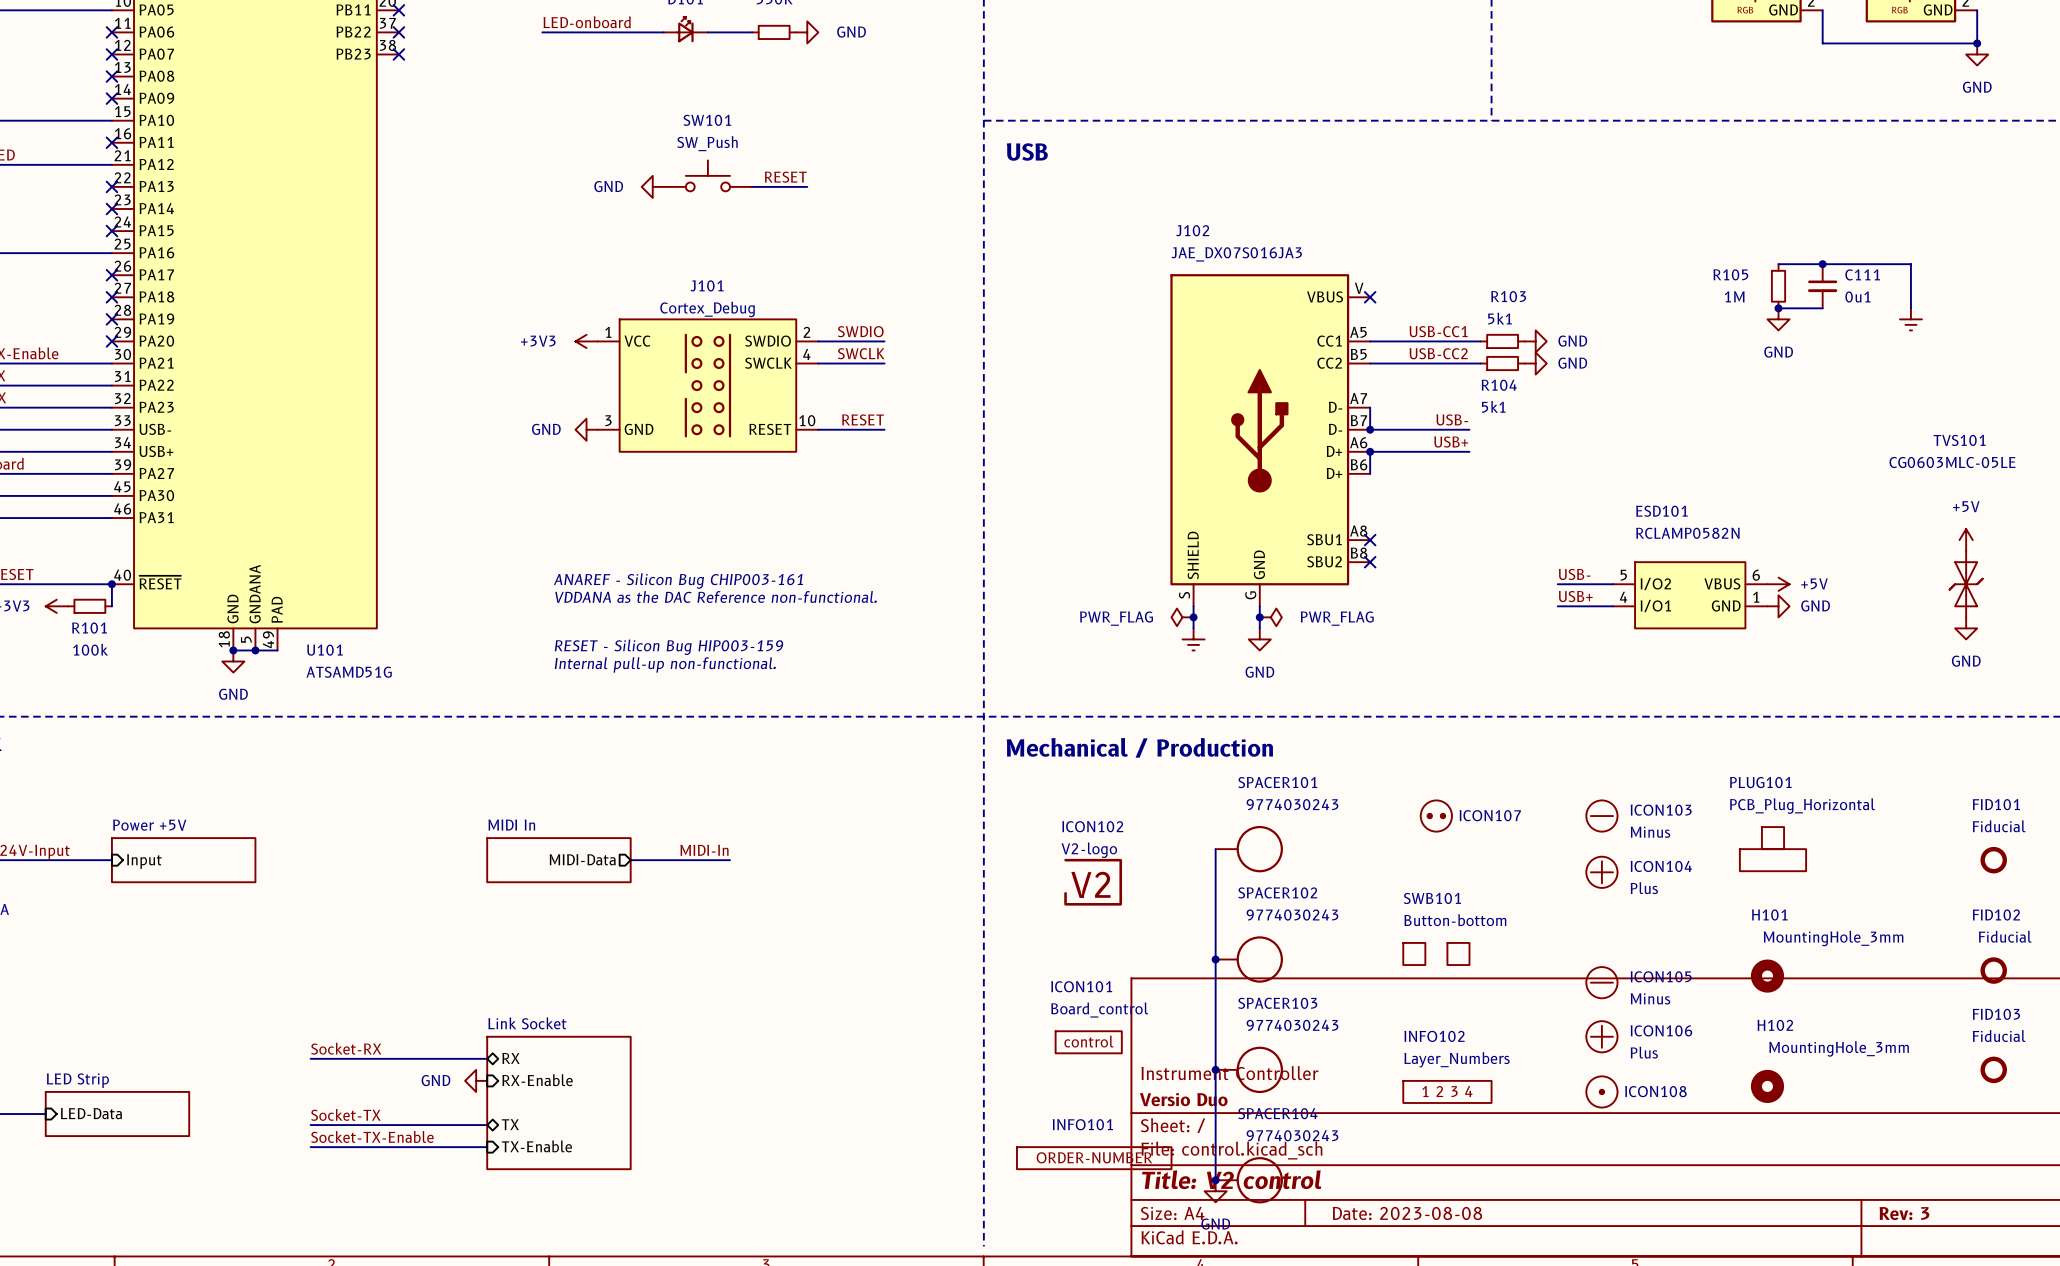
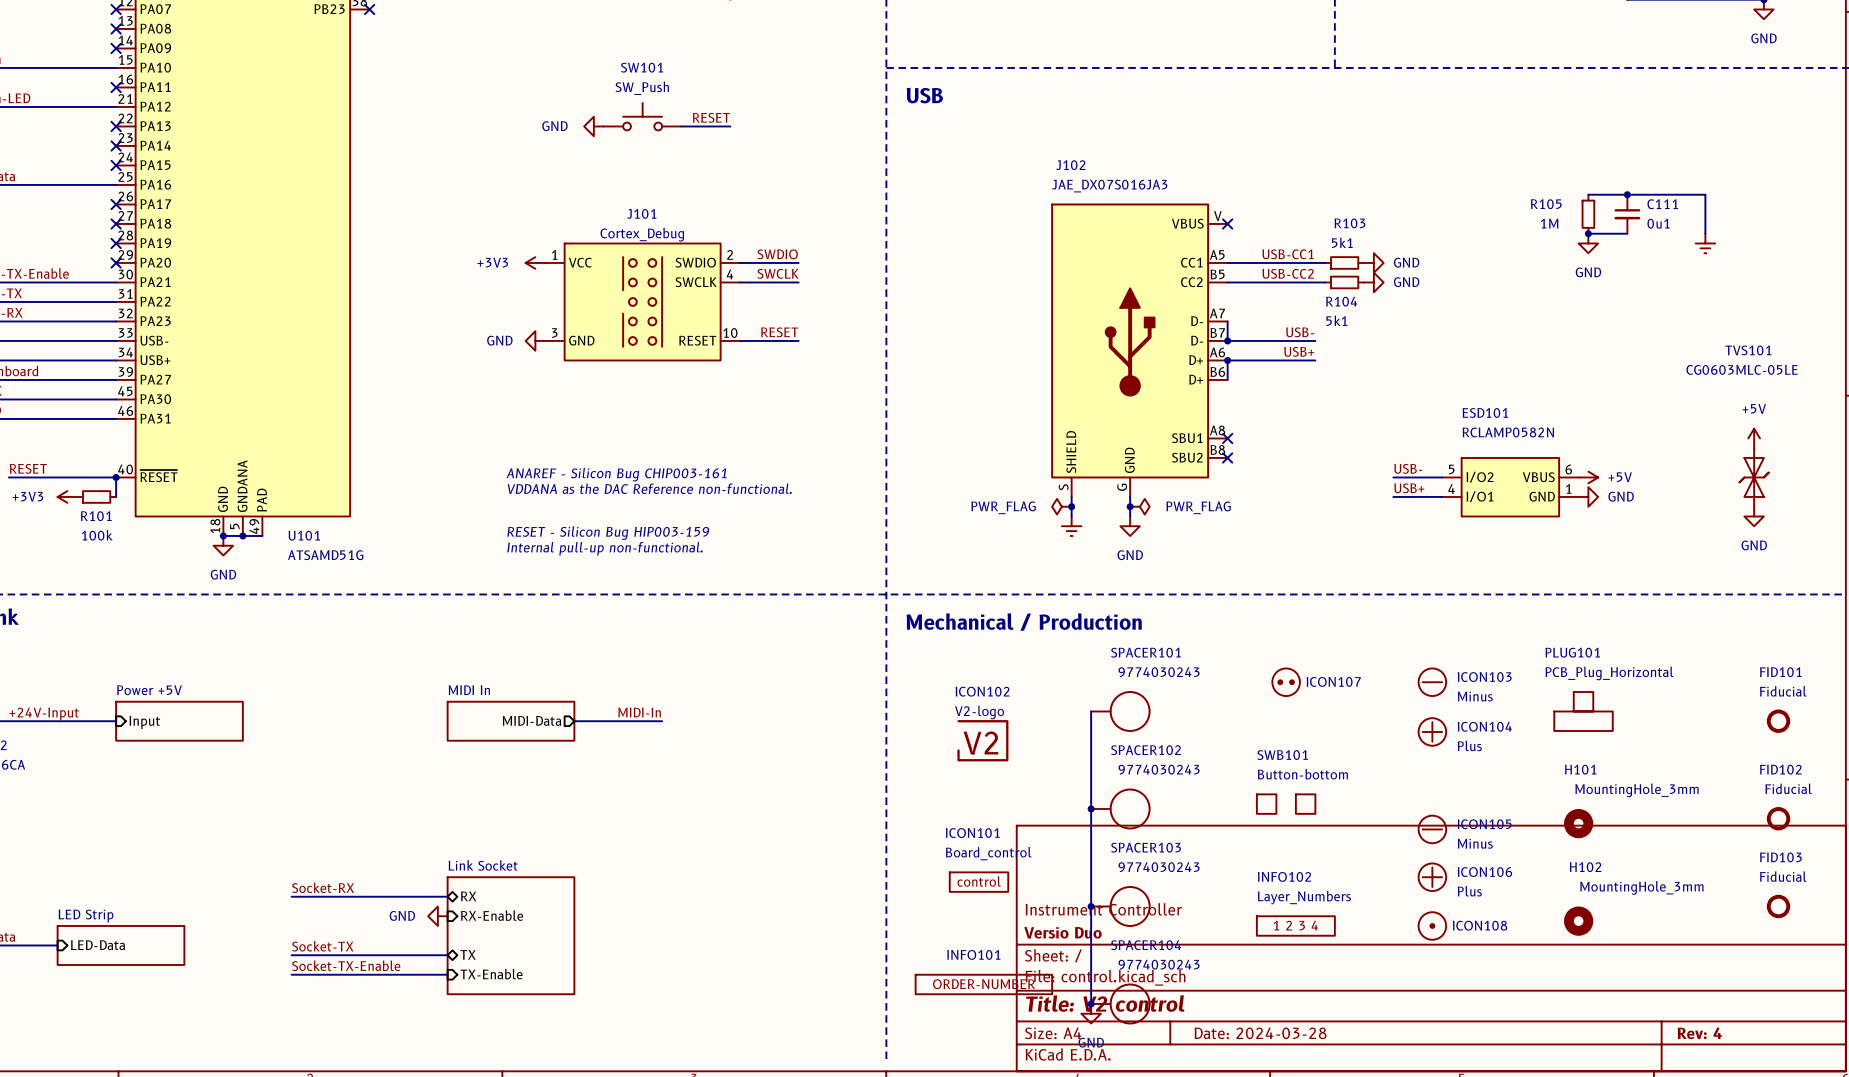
title block: Date: 2023-08-08 (1407, 1213) -> Date: 2024-03-28 (1260, 1033)
title block: Rev: 3 (1904, 1213) -> Rev: 4 (1699, 1033)

